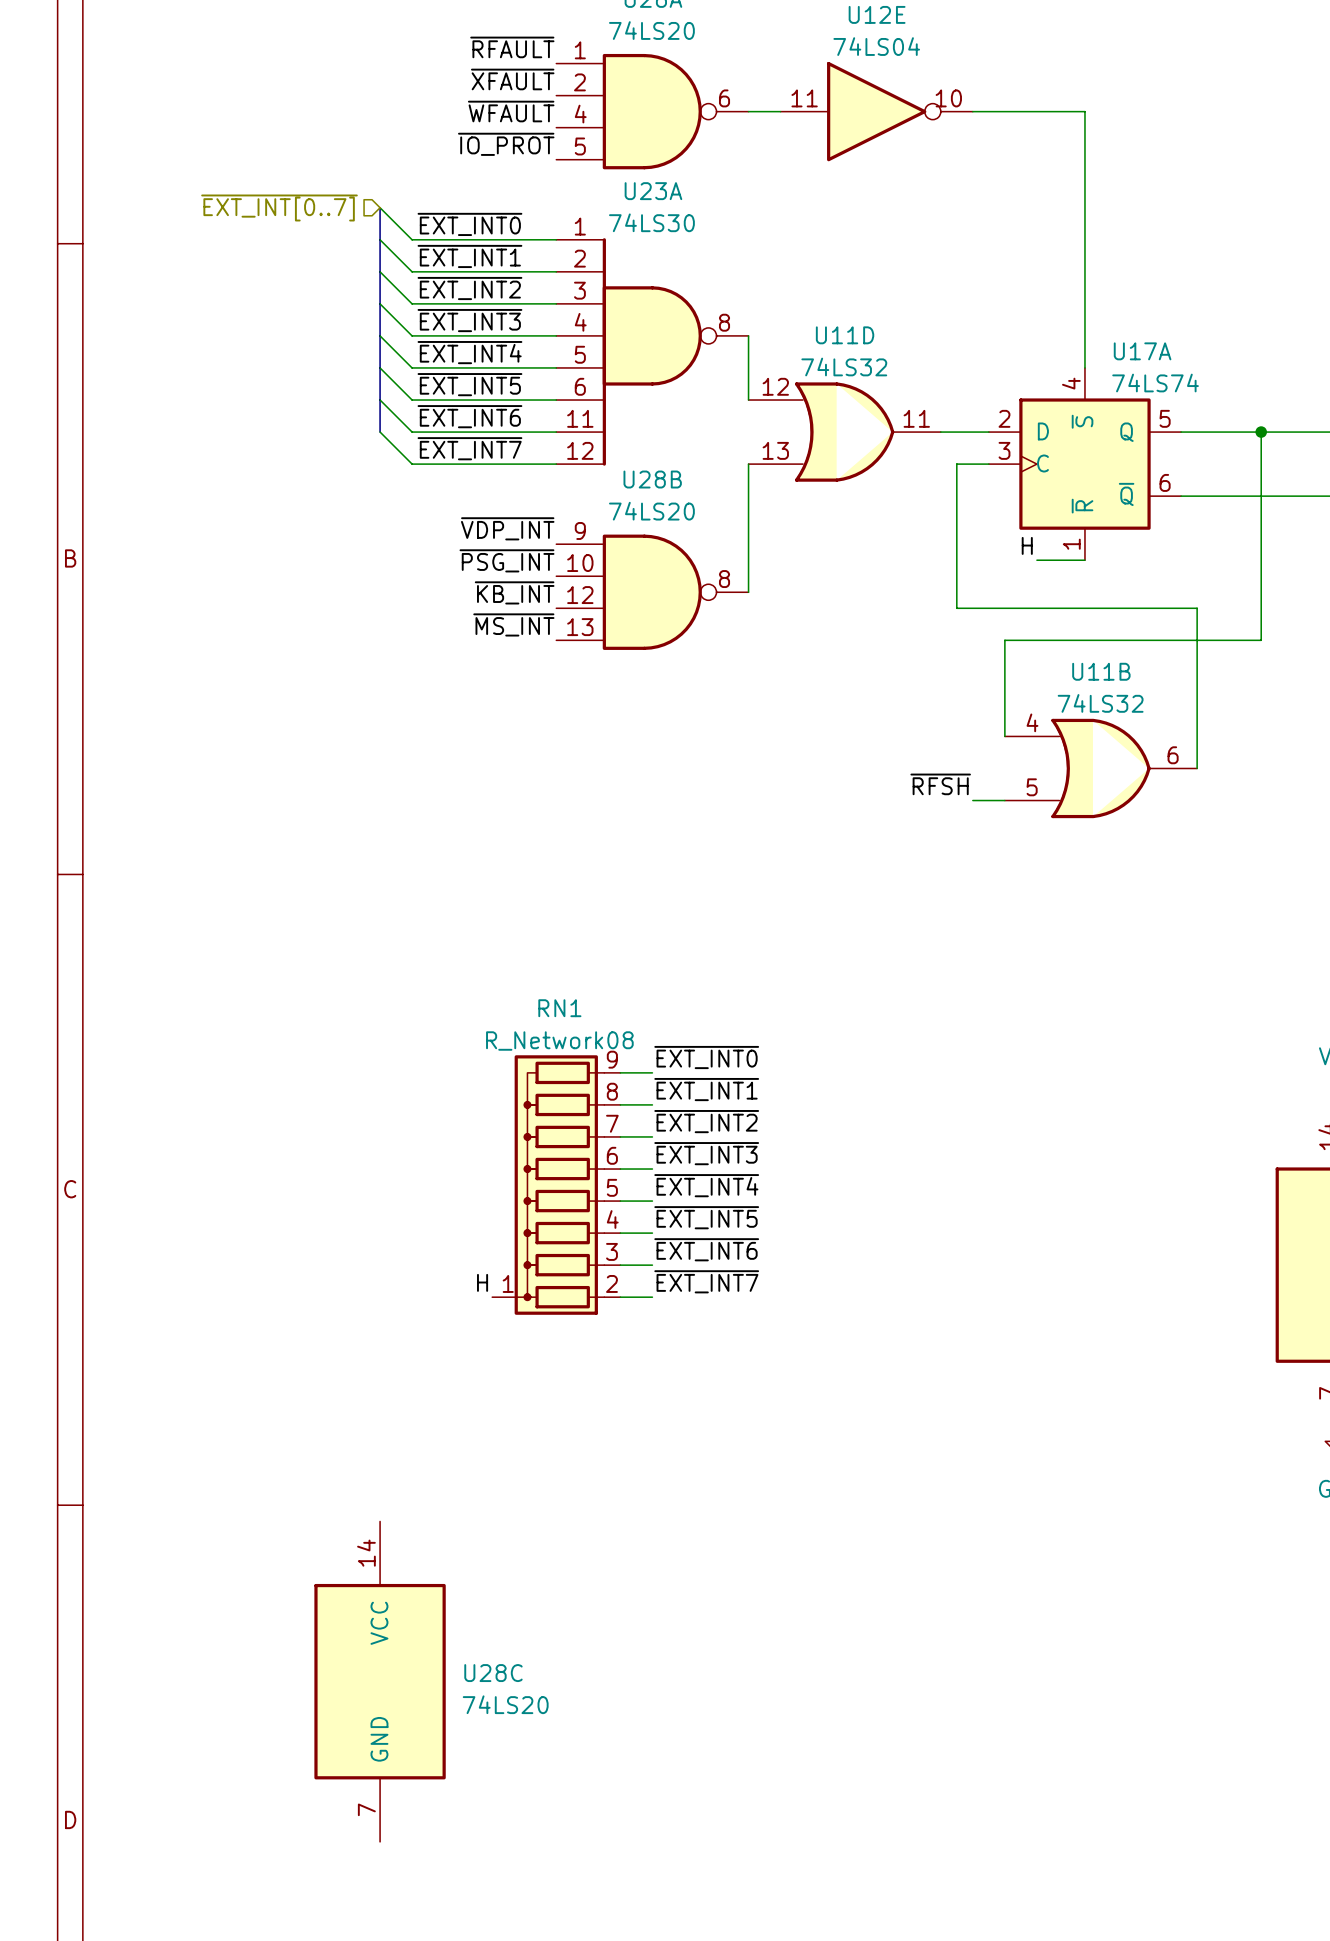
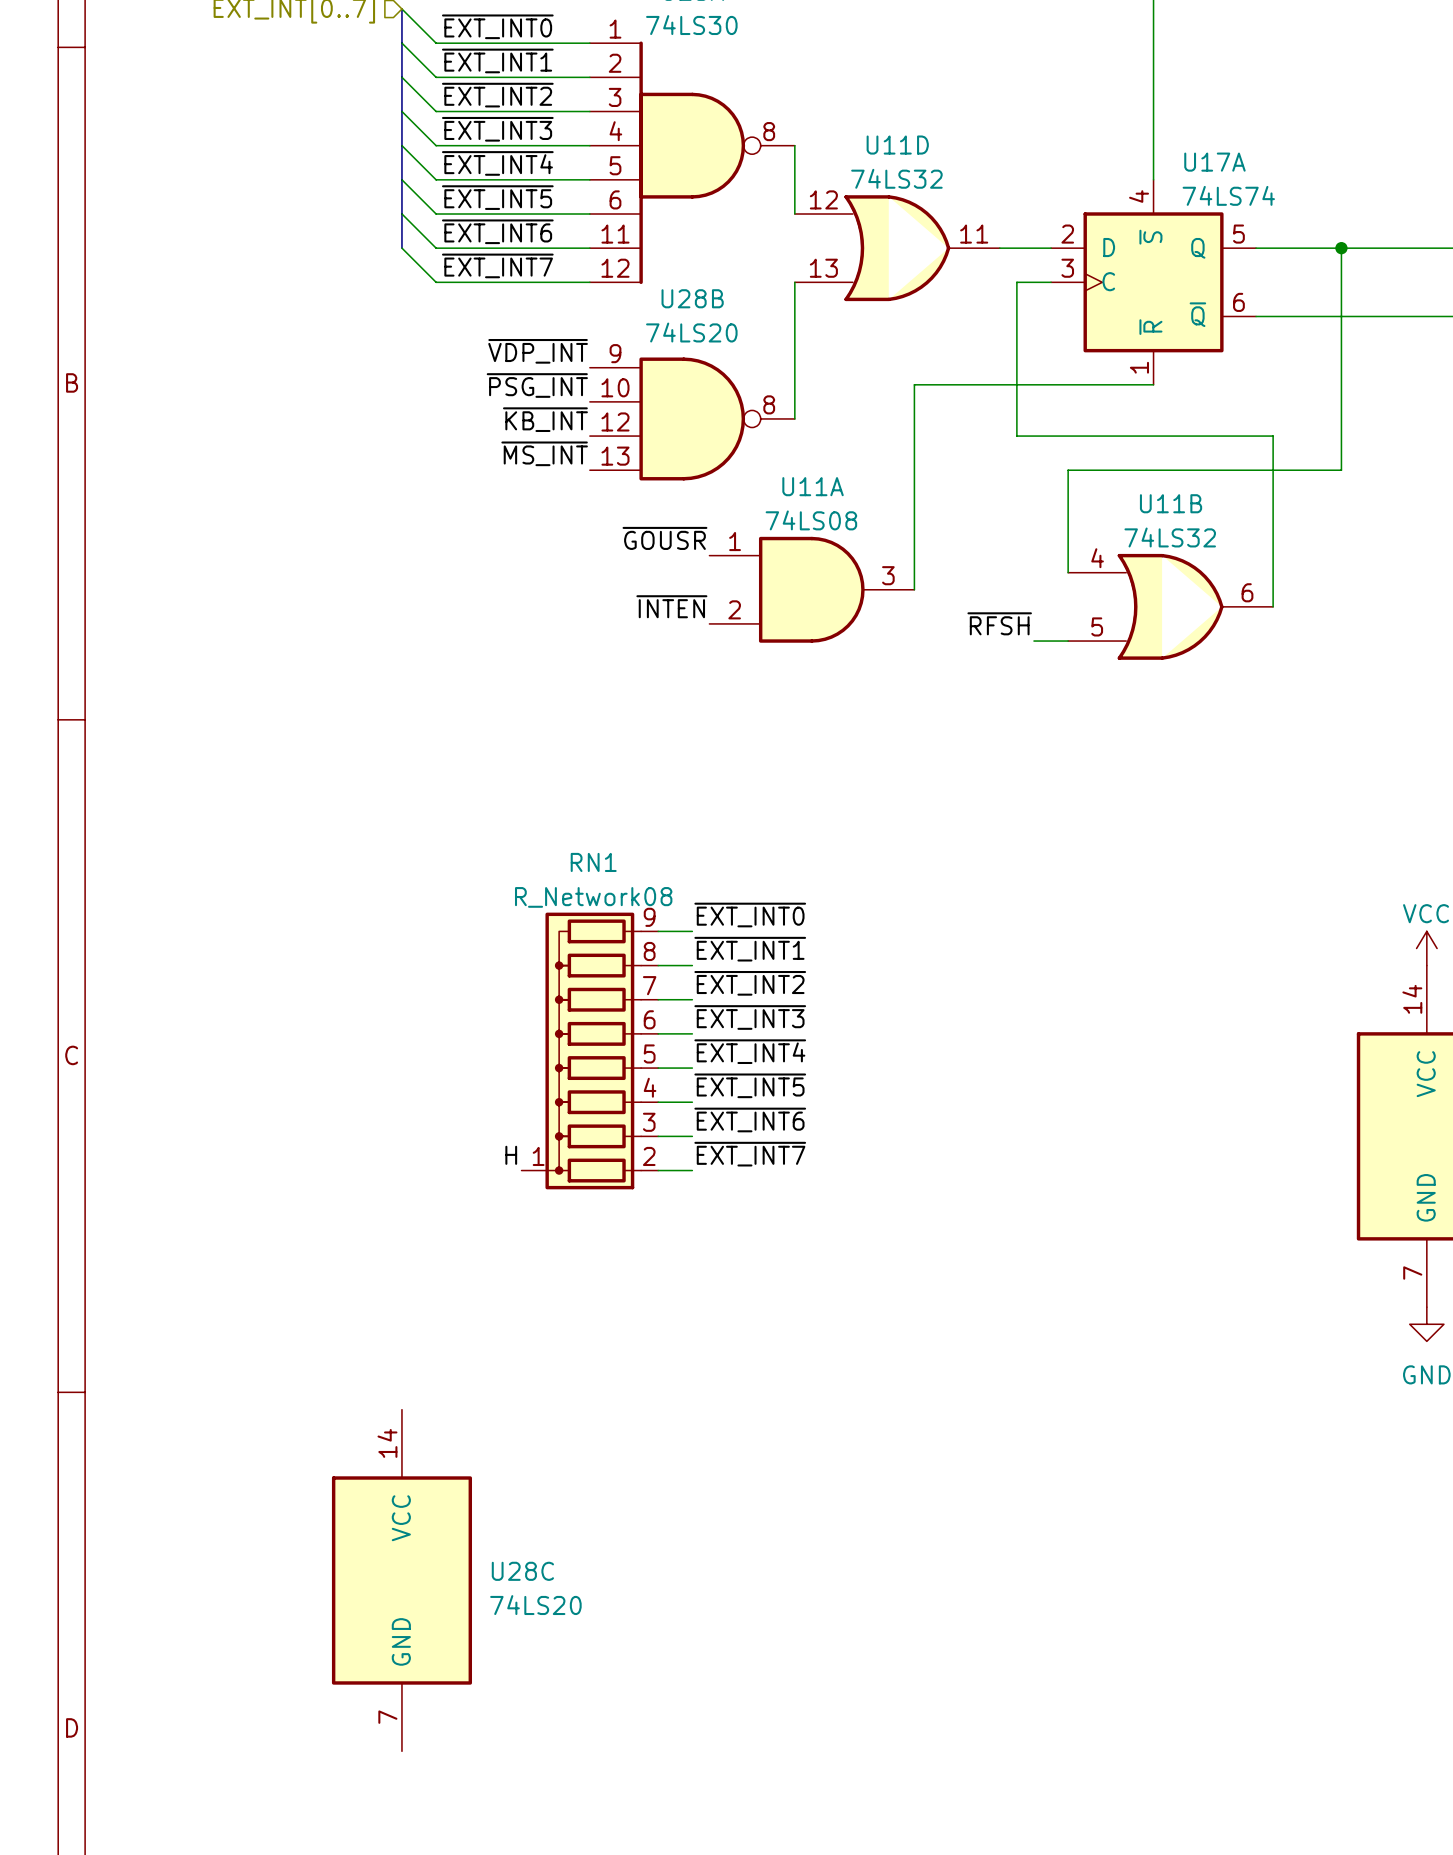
label: H (1027, 545) -> none
wire: none -> (1102, 384) (914, 384) (914, 589)
label: none -> ~{GOUSR} (664, 538)
U11A: none -> 74LS08 (811, 589)
label: none -> ~{INTEN} (671, 606)

